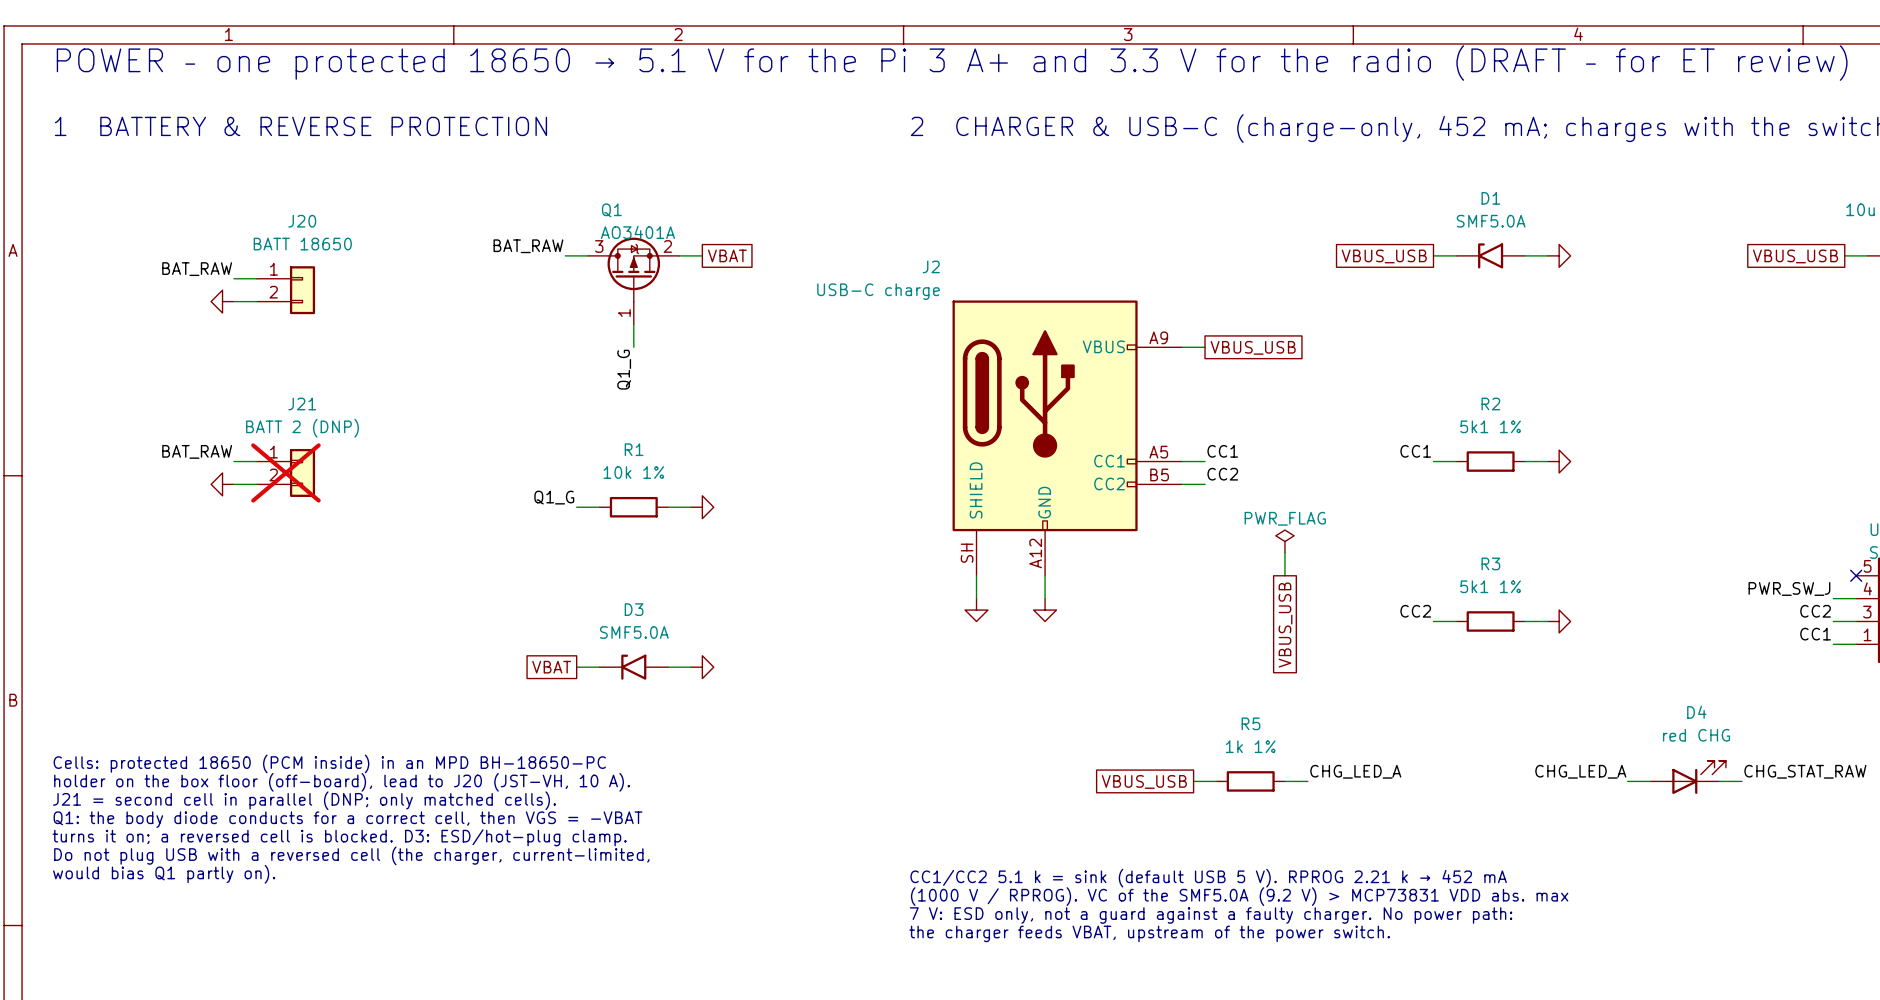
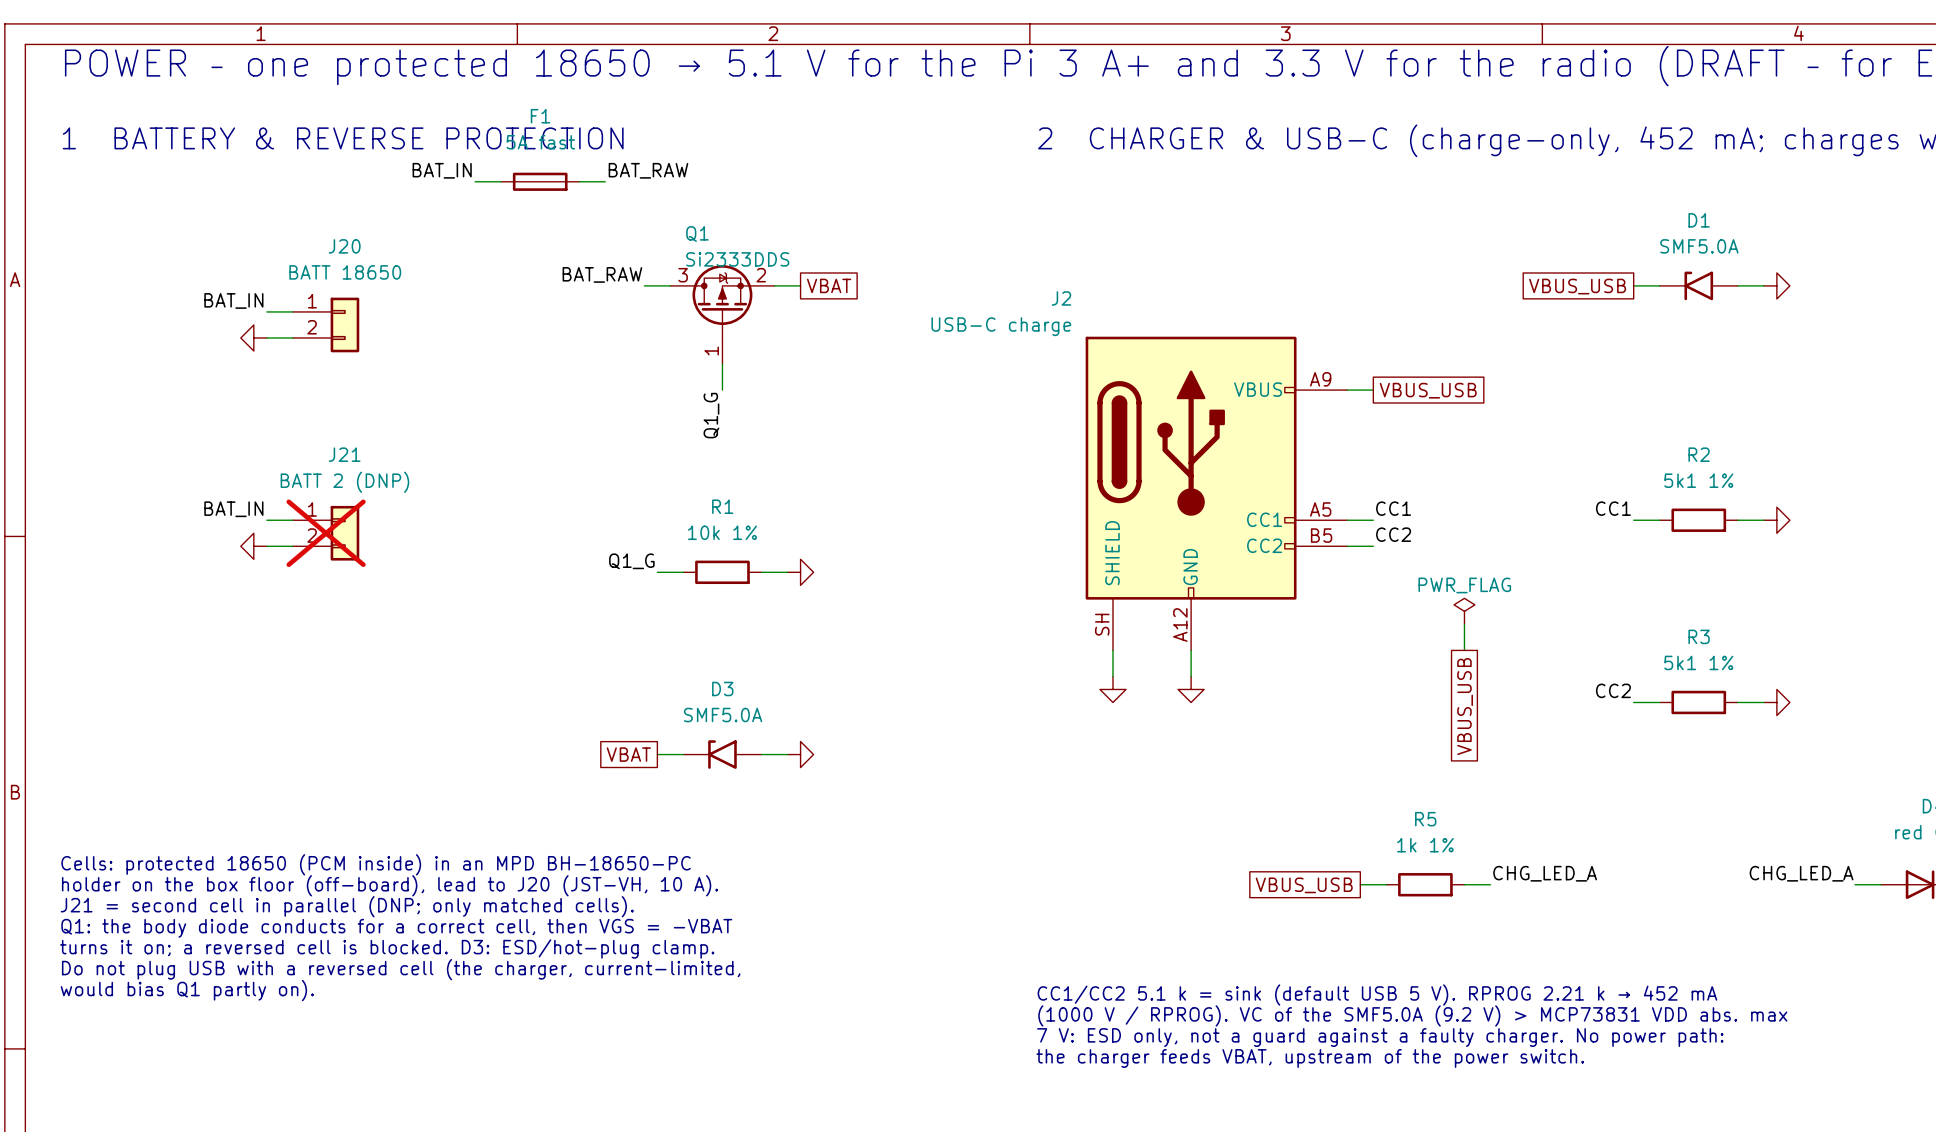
label: none -> BAT_IN (442, 170)
label: none -> BAT_RAW (648, 170)
wire: none -> (475, 181) (501, 181)
F1: none -> 5A fast (540, 181)
wire: none -> (579, 181) (605, 181)
Q1 value: AO3401A (637, 232) -> Si2333DDS (737, 259)
label: BAT_RAW (197, 269) -> BAT_IN (233, 300)
label: BAT_RAW (197, 451) -> BAT_IN (233, 509)

